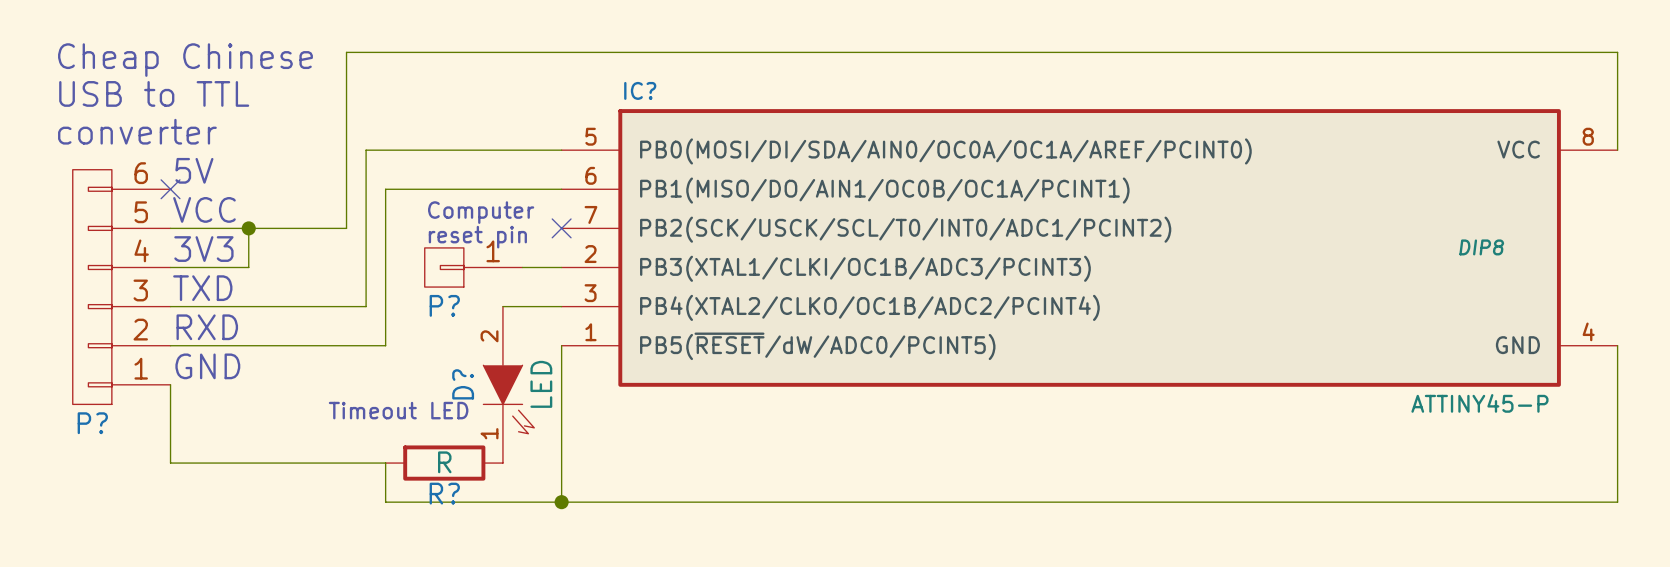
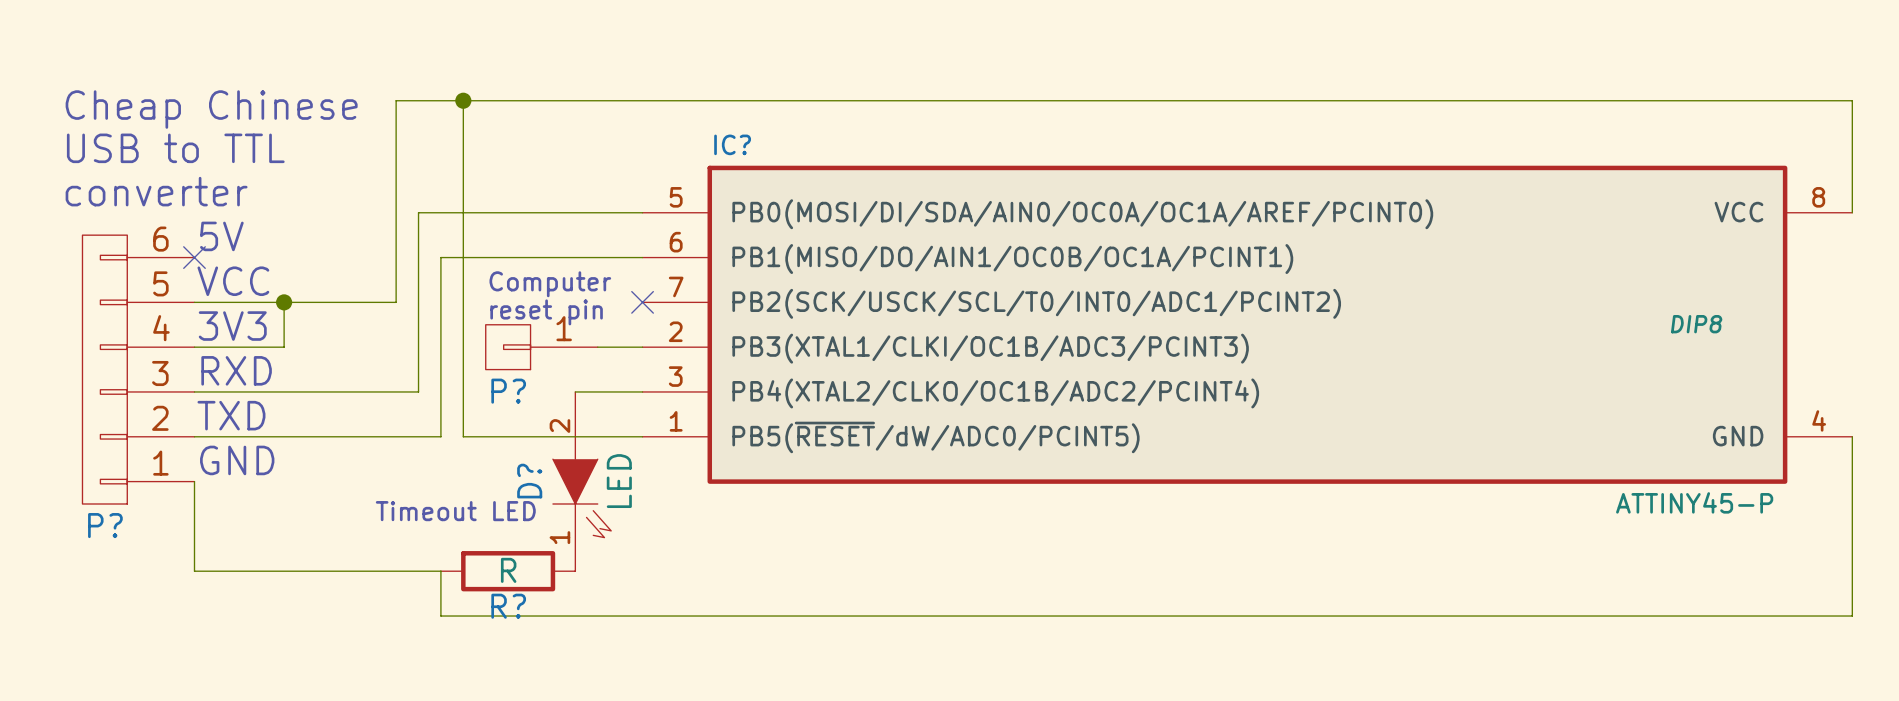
junction: none -> (463, 100)
text: TXD (202, 288) -> RXD (236, 370)
text: RXD (207, 327) -> TXD (231, 415)
wire: (561, 345) (561, 502) -> (642, 436) (463, 436) (463, 100)
junction: (561, 502) -> none

